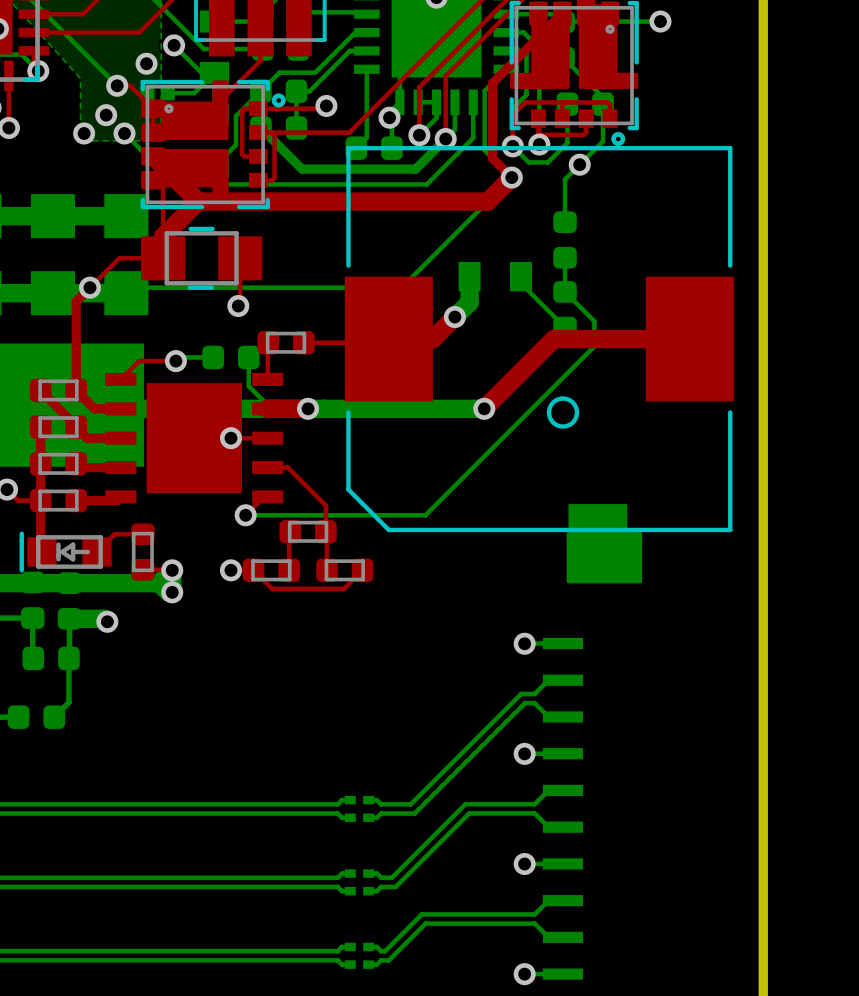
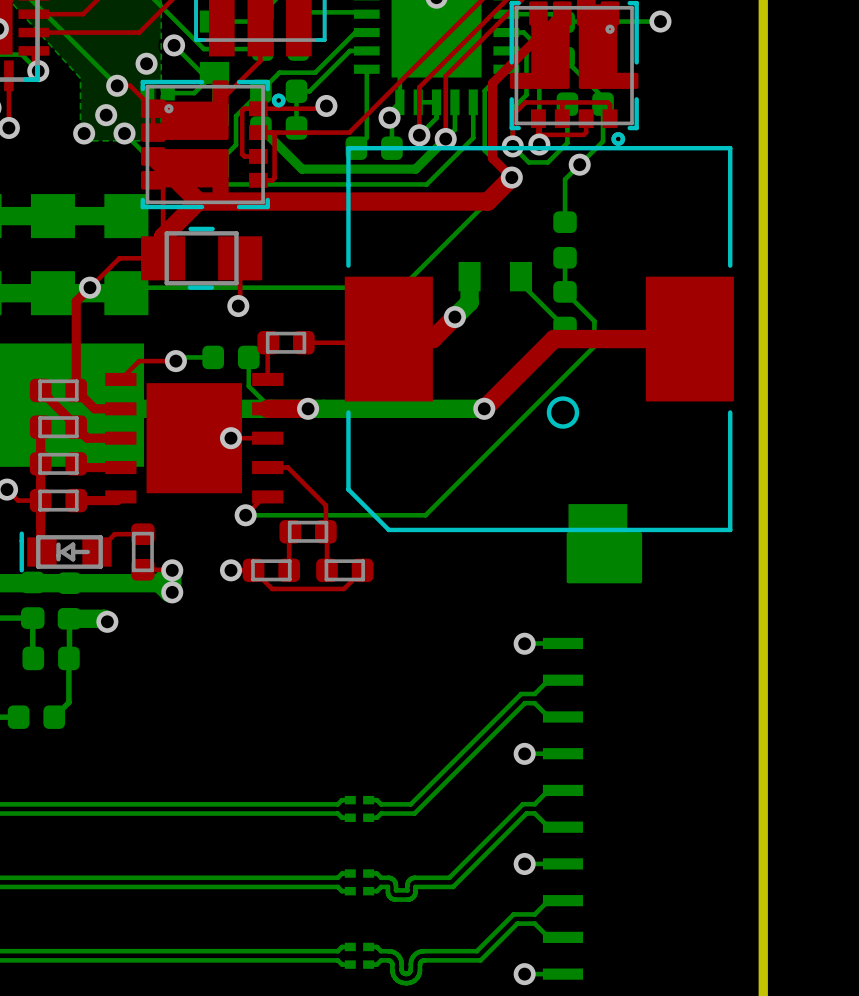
bottom track: (522, 804) (465, 804) (391, 877) (388, 877) -> (522, 804) (449, 877) (413, 877) (408, 882) (407, 890) (395, 890) (395, 882) (388, 877)
bottom track: (526, 813) (469, 813) (395, 886) (387, 886) -> (526, 813) (453, 886) (415, 886) (414, 895) (407, 899) (390, 897) (388, 893) (387, 886)
bottom track: (513, 914) (421, 914) (385, 951) -> (513, 914) (476, 951) (420, 951) (413, 956) (410, 971) (406, 973)
bottom track: (517, 923) (425, 923) (387, 960) -> (517, 923) (480, 960) (423, 960) (420, 963) (418, 975) (409, 982) (402, 982) (395, 978) (391, 962) (387, 960)
bottom track: none -> (385, 951) (394, 952) (398, 956) (402, 971) (406, 973)

